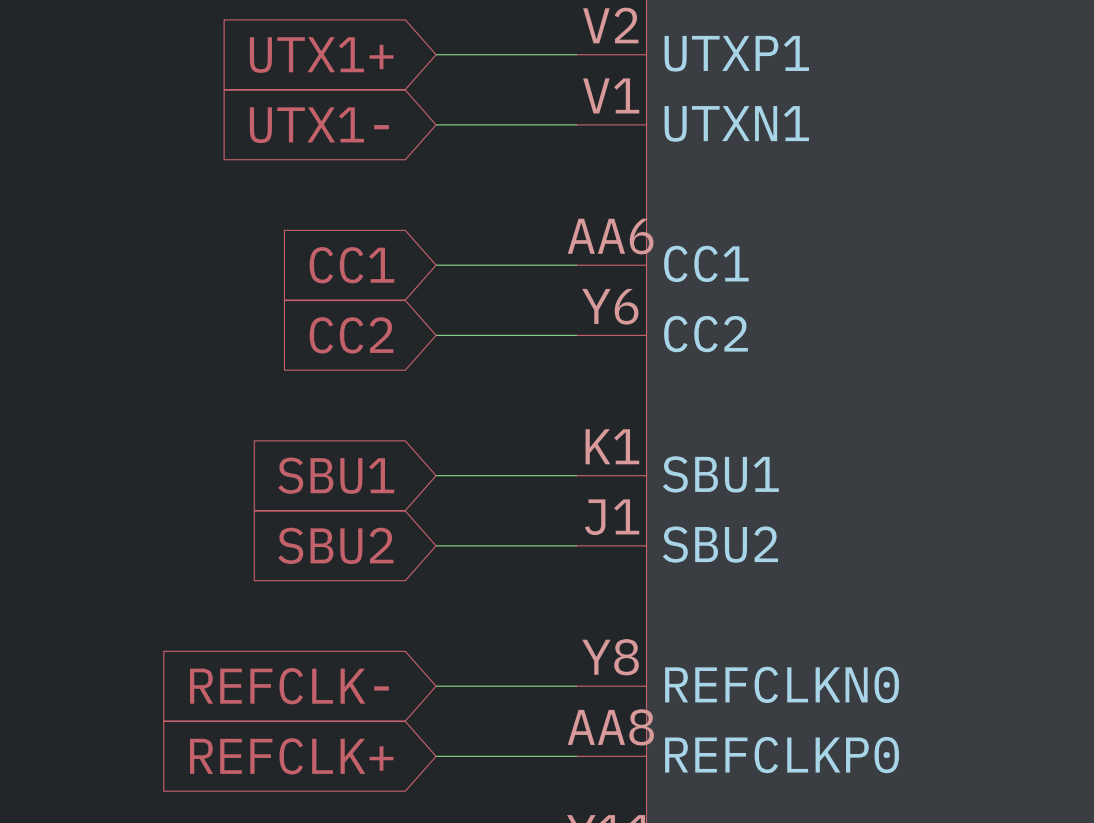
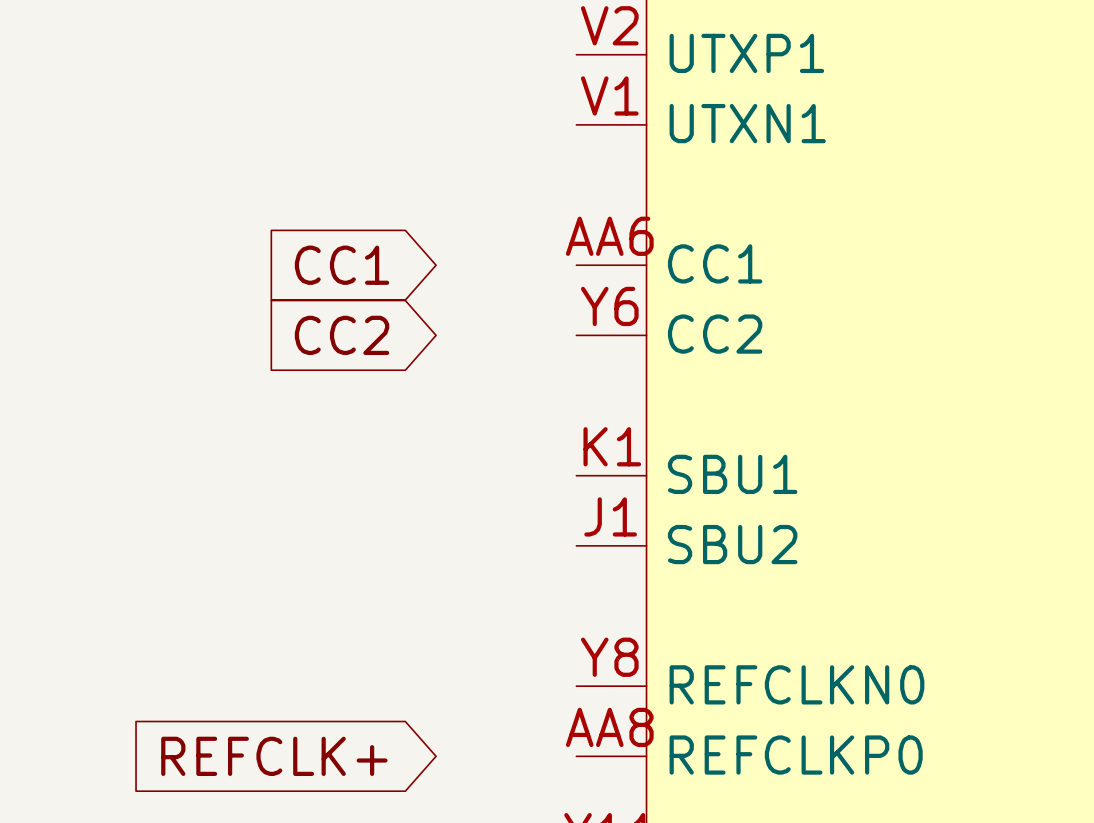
wire: (436, 54) (576, 54) -> none
global label: UTX1+ (321, 55) -> none
wire: (436, 124) (576, 124) -> none
global label: UTX1- (319, 125) -> none
wire: (436, 265) (576, 265) -> none
wire: (436, 335) (576, 335) -> none
global label: SBU1 (336, 475) -> none
wire: (436, 475) (576, 475) -> none
global label: SBU2 (335, 545) -> none
wire: (436, 545) (576, 545) -> none
global label: REFCLK- (289, 686) -> none
wire: (436, 686) (576, 686) -> none
wire: (436, 756) (576, 756) -> none

